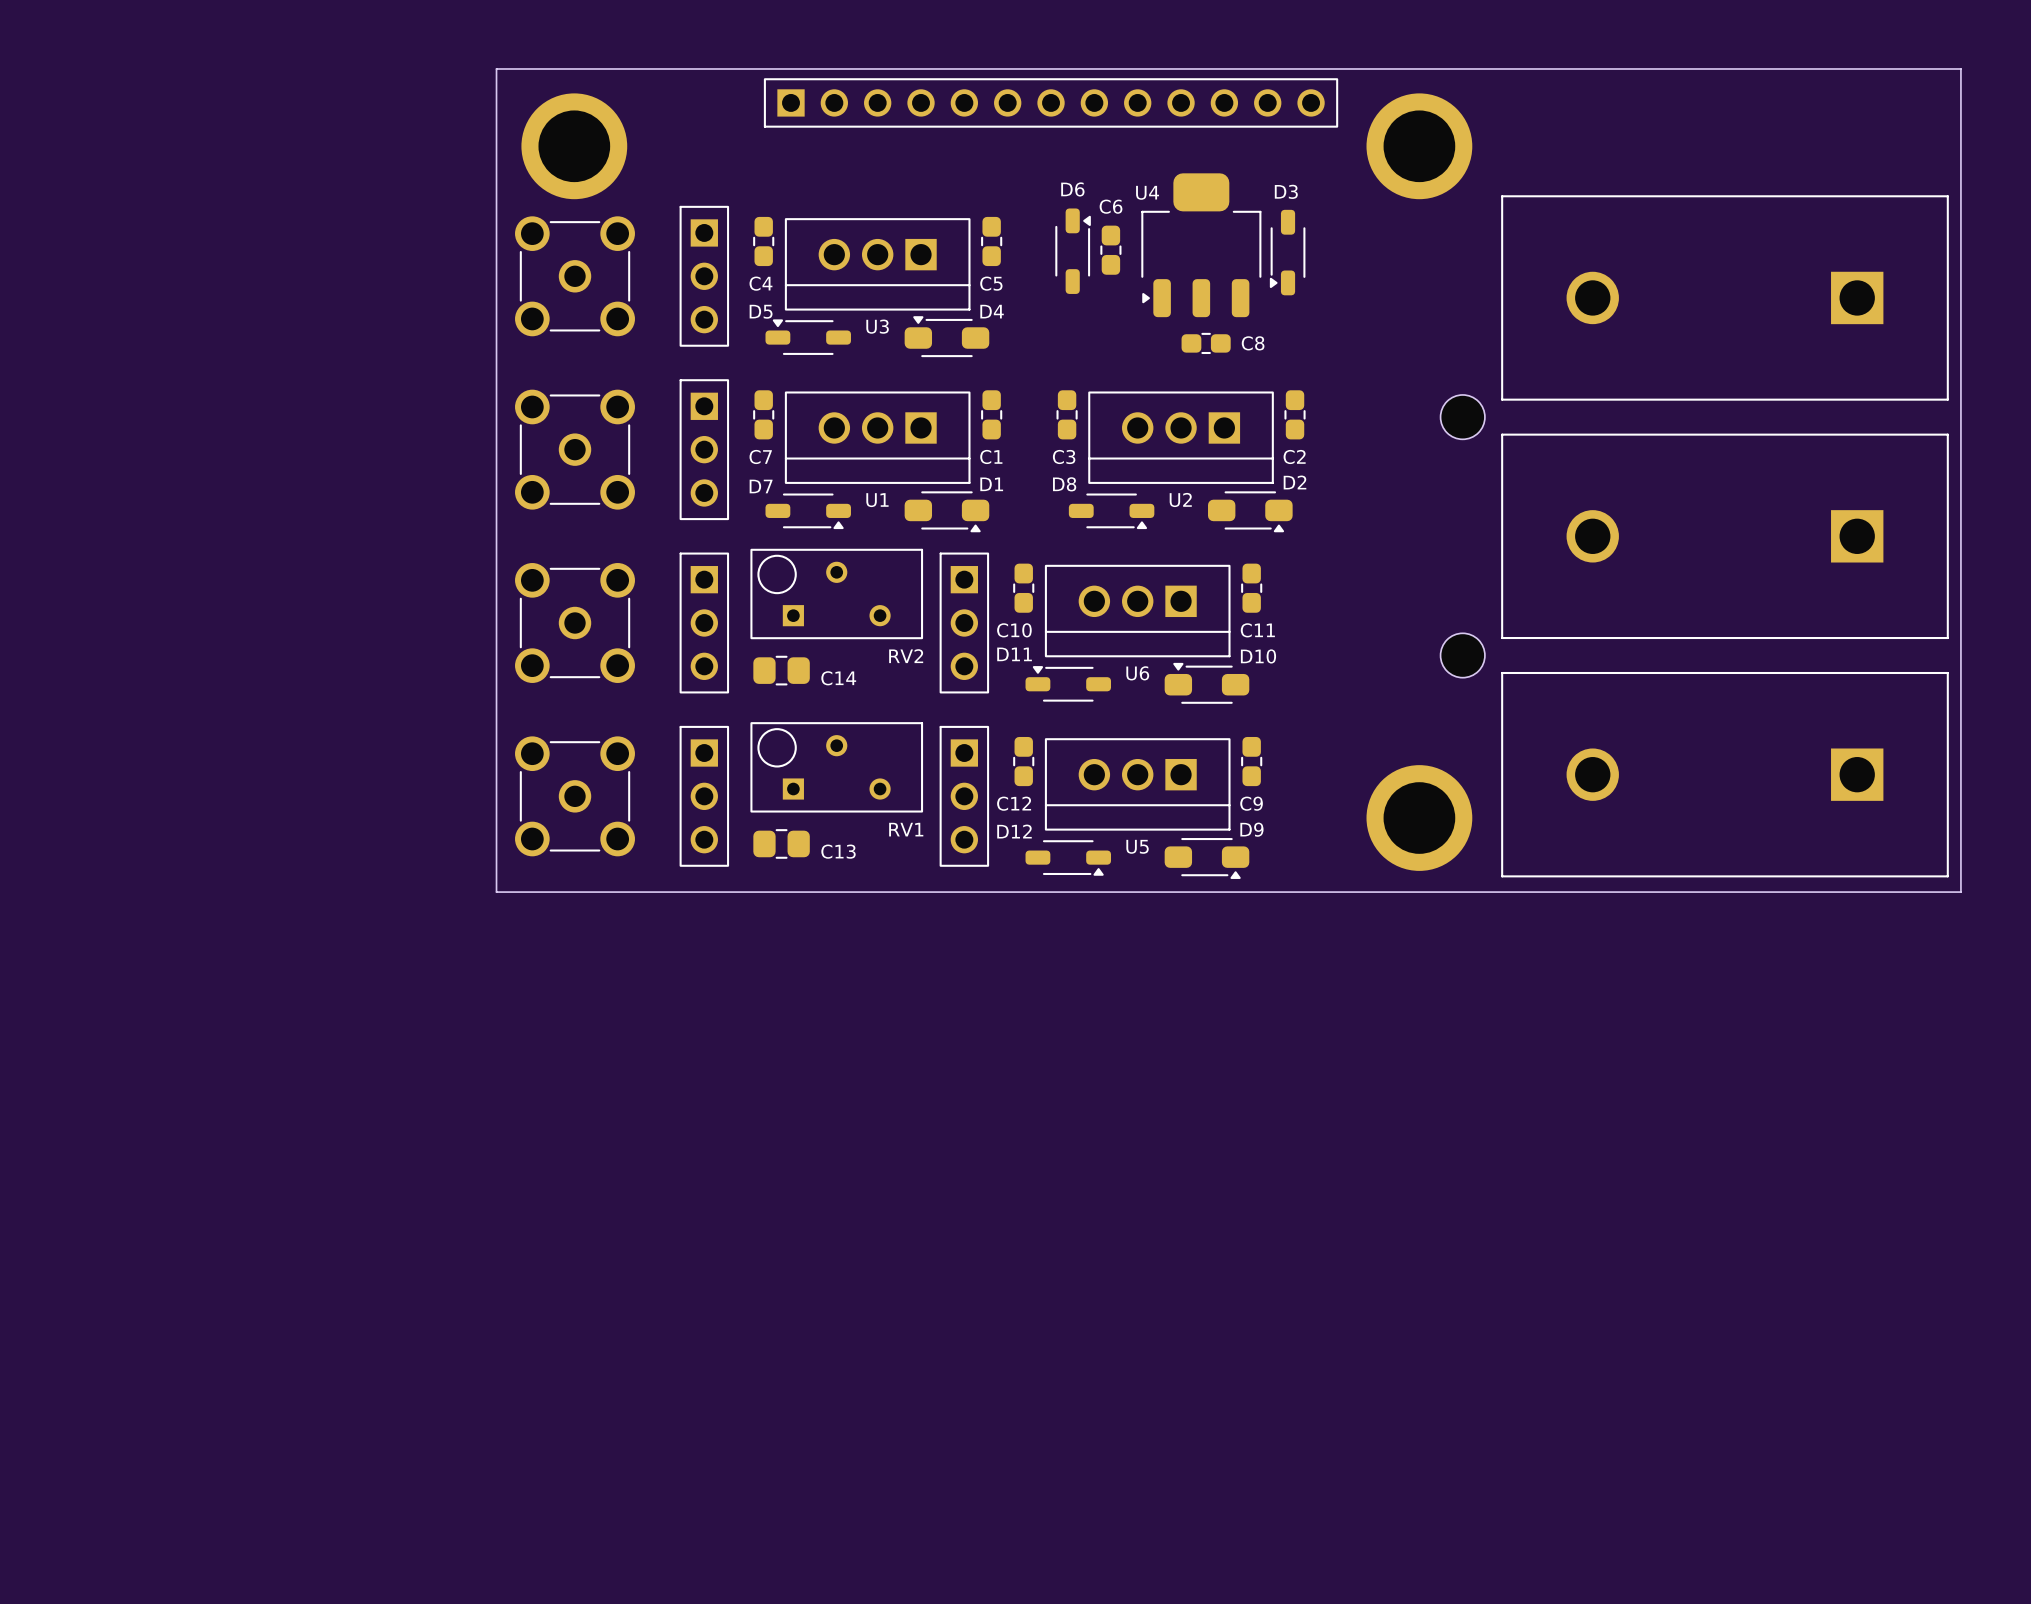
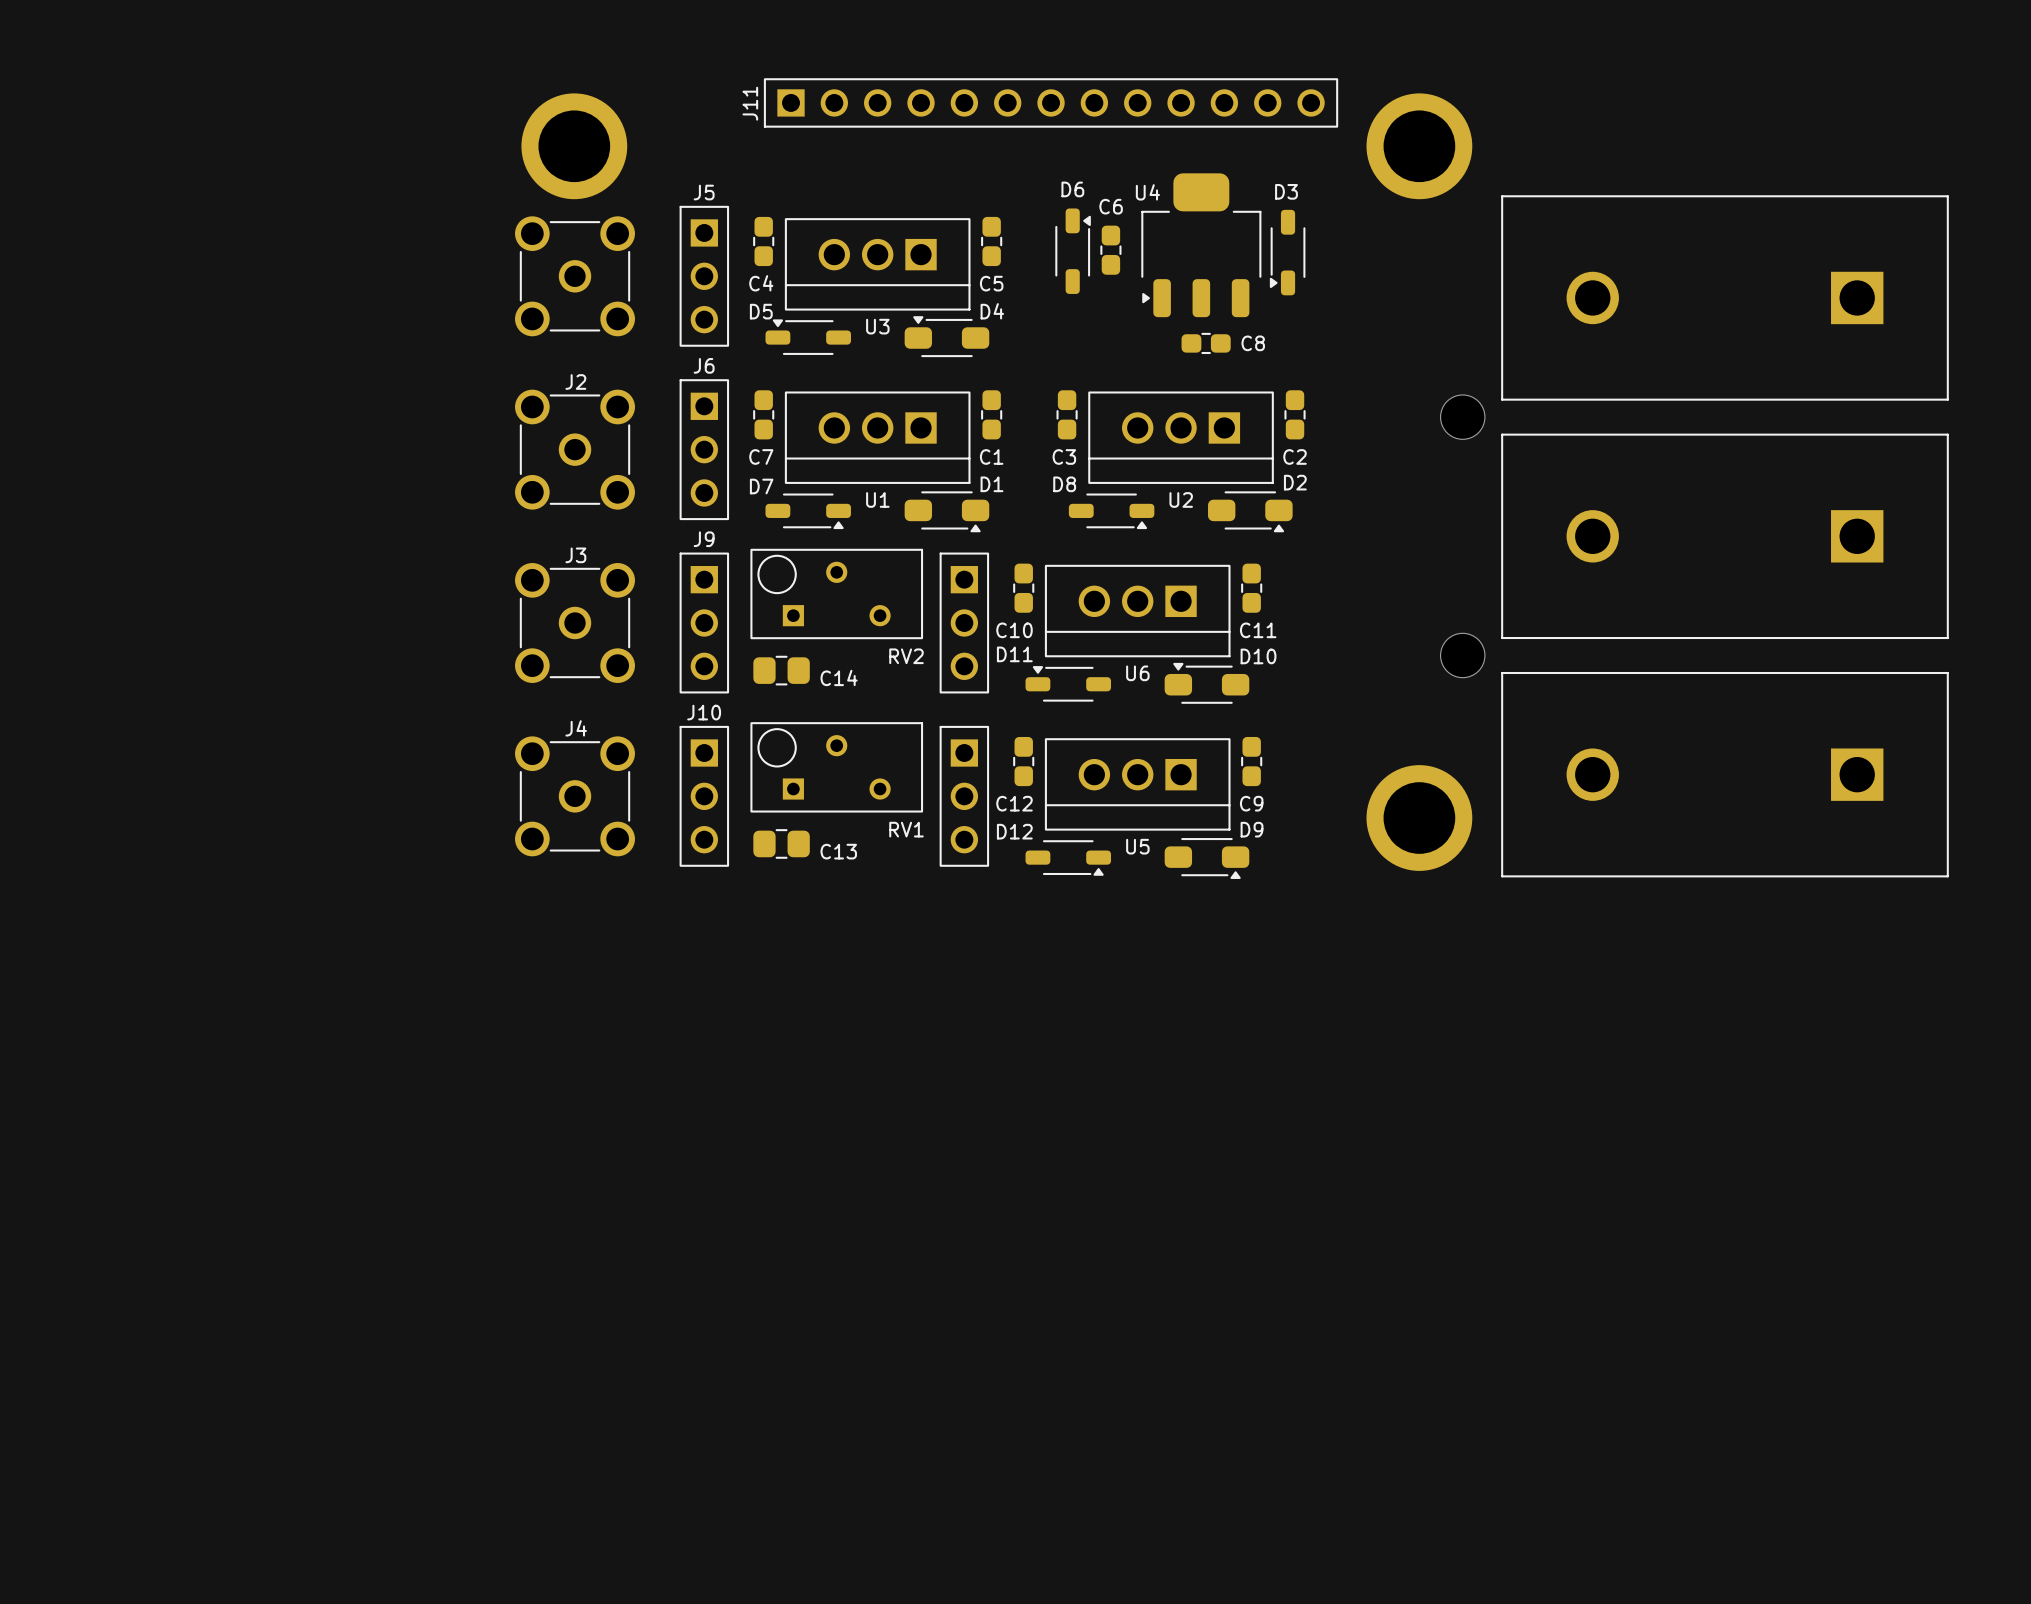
board edge: (496, 68) (1960, 68) (1960, 892) (496, 892) (496, 68) -> none
J11 name: none -> J11 (750, 103)
J5 name: none -> J5 (704, 192)
J6 name: none -> J6 (704, 365)
J2 name: none -> J2 (575, 382)
J9 name: none -> J9 (704, 539)
J3 name: none -> J3 (575, 555)
J10 name: none -> J10 (704, 712)
J4 name: none -> J4 (576, 728)

